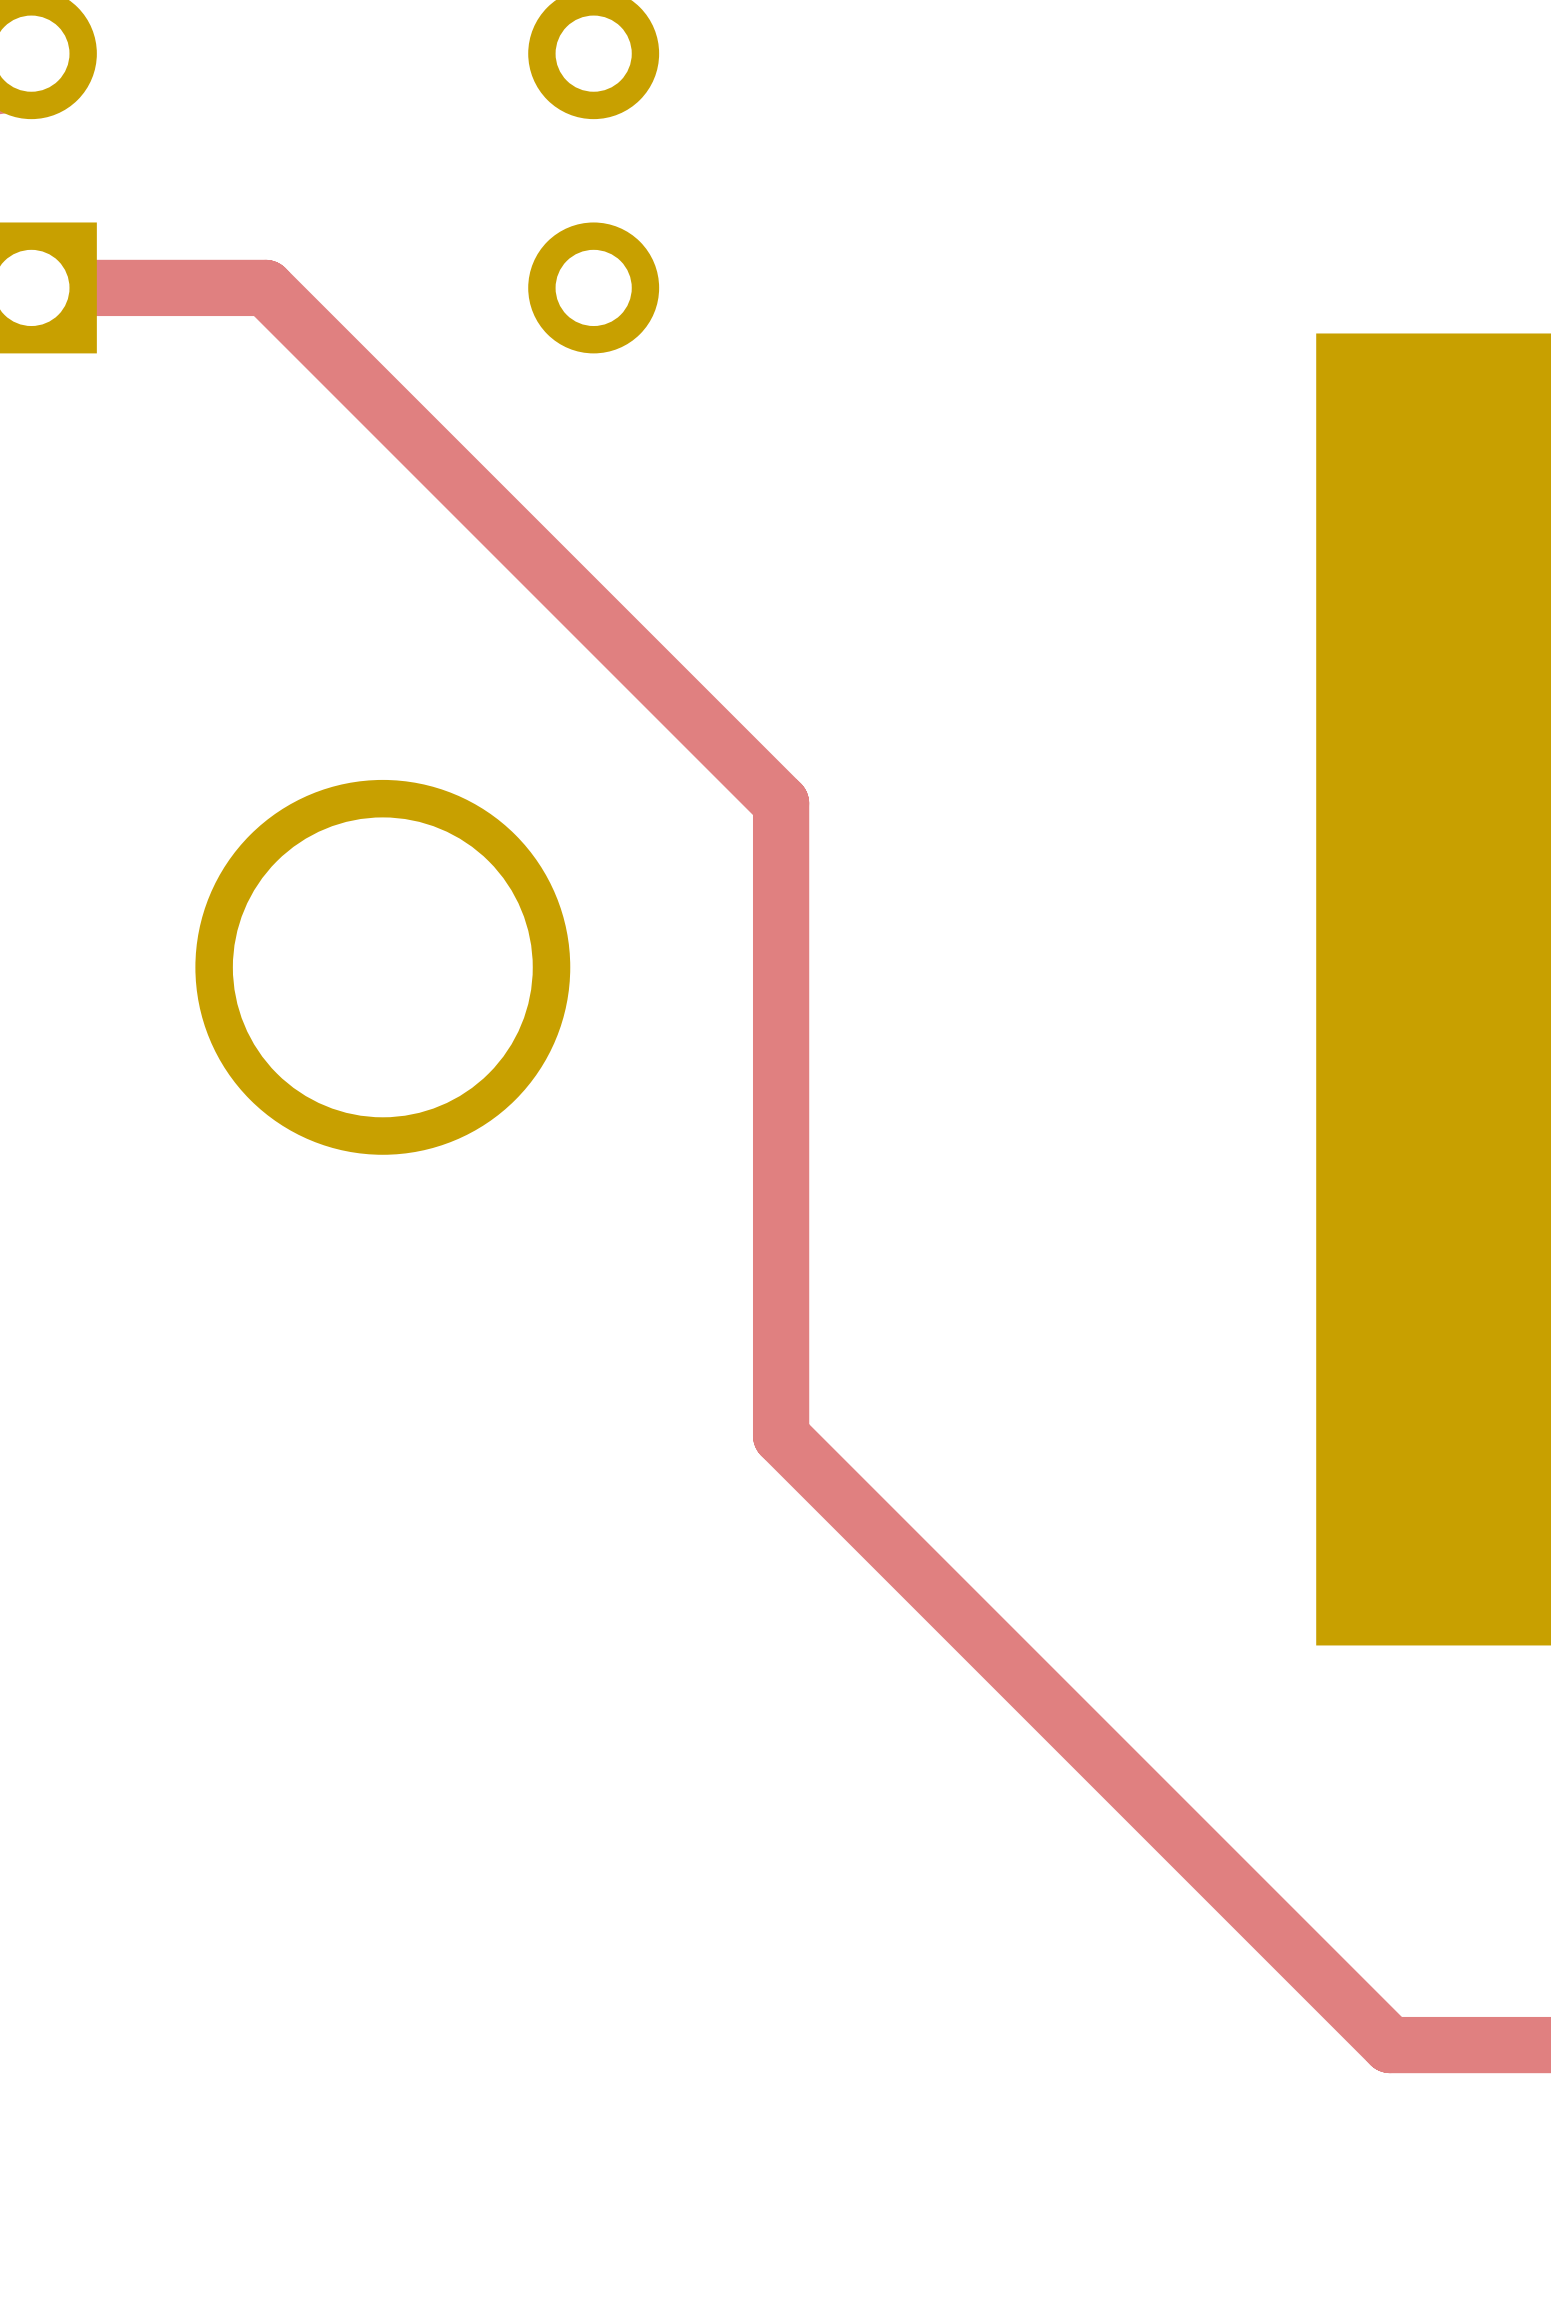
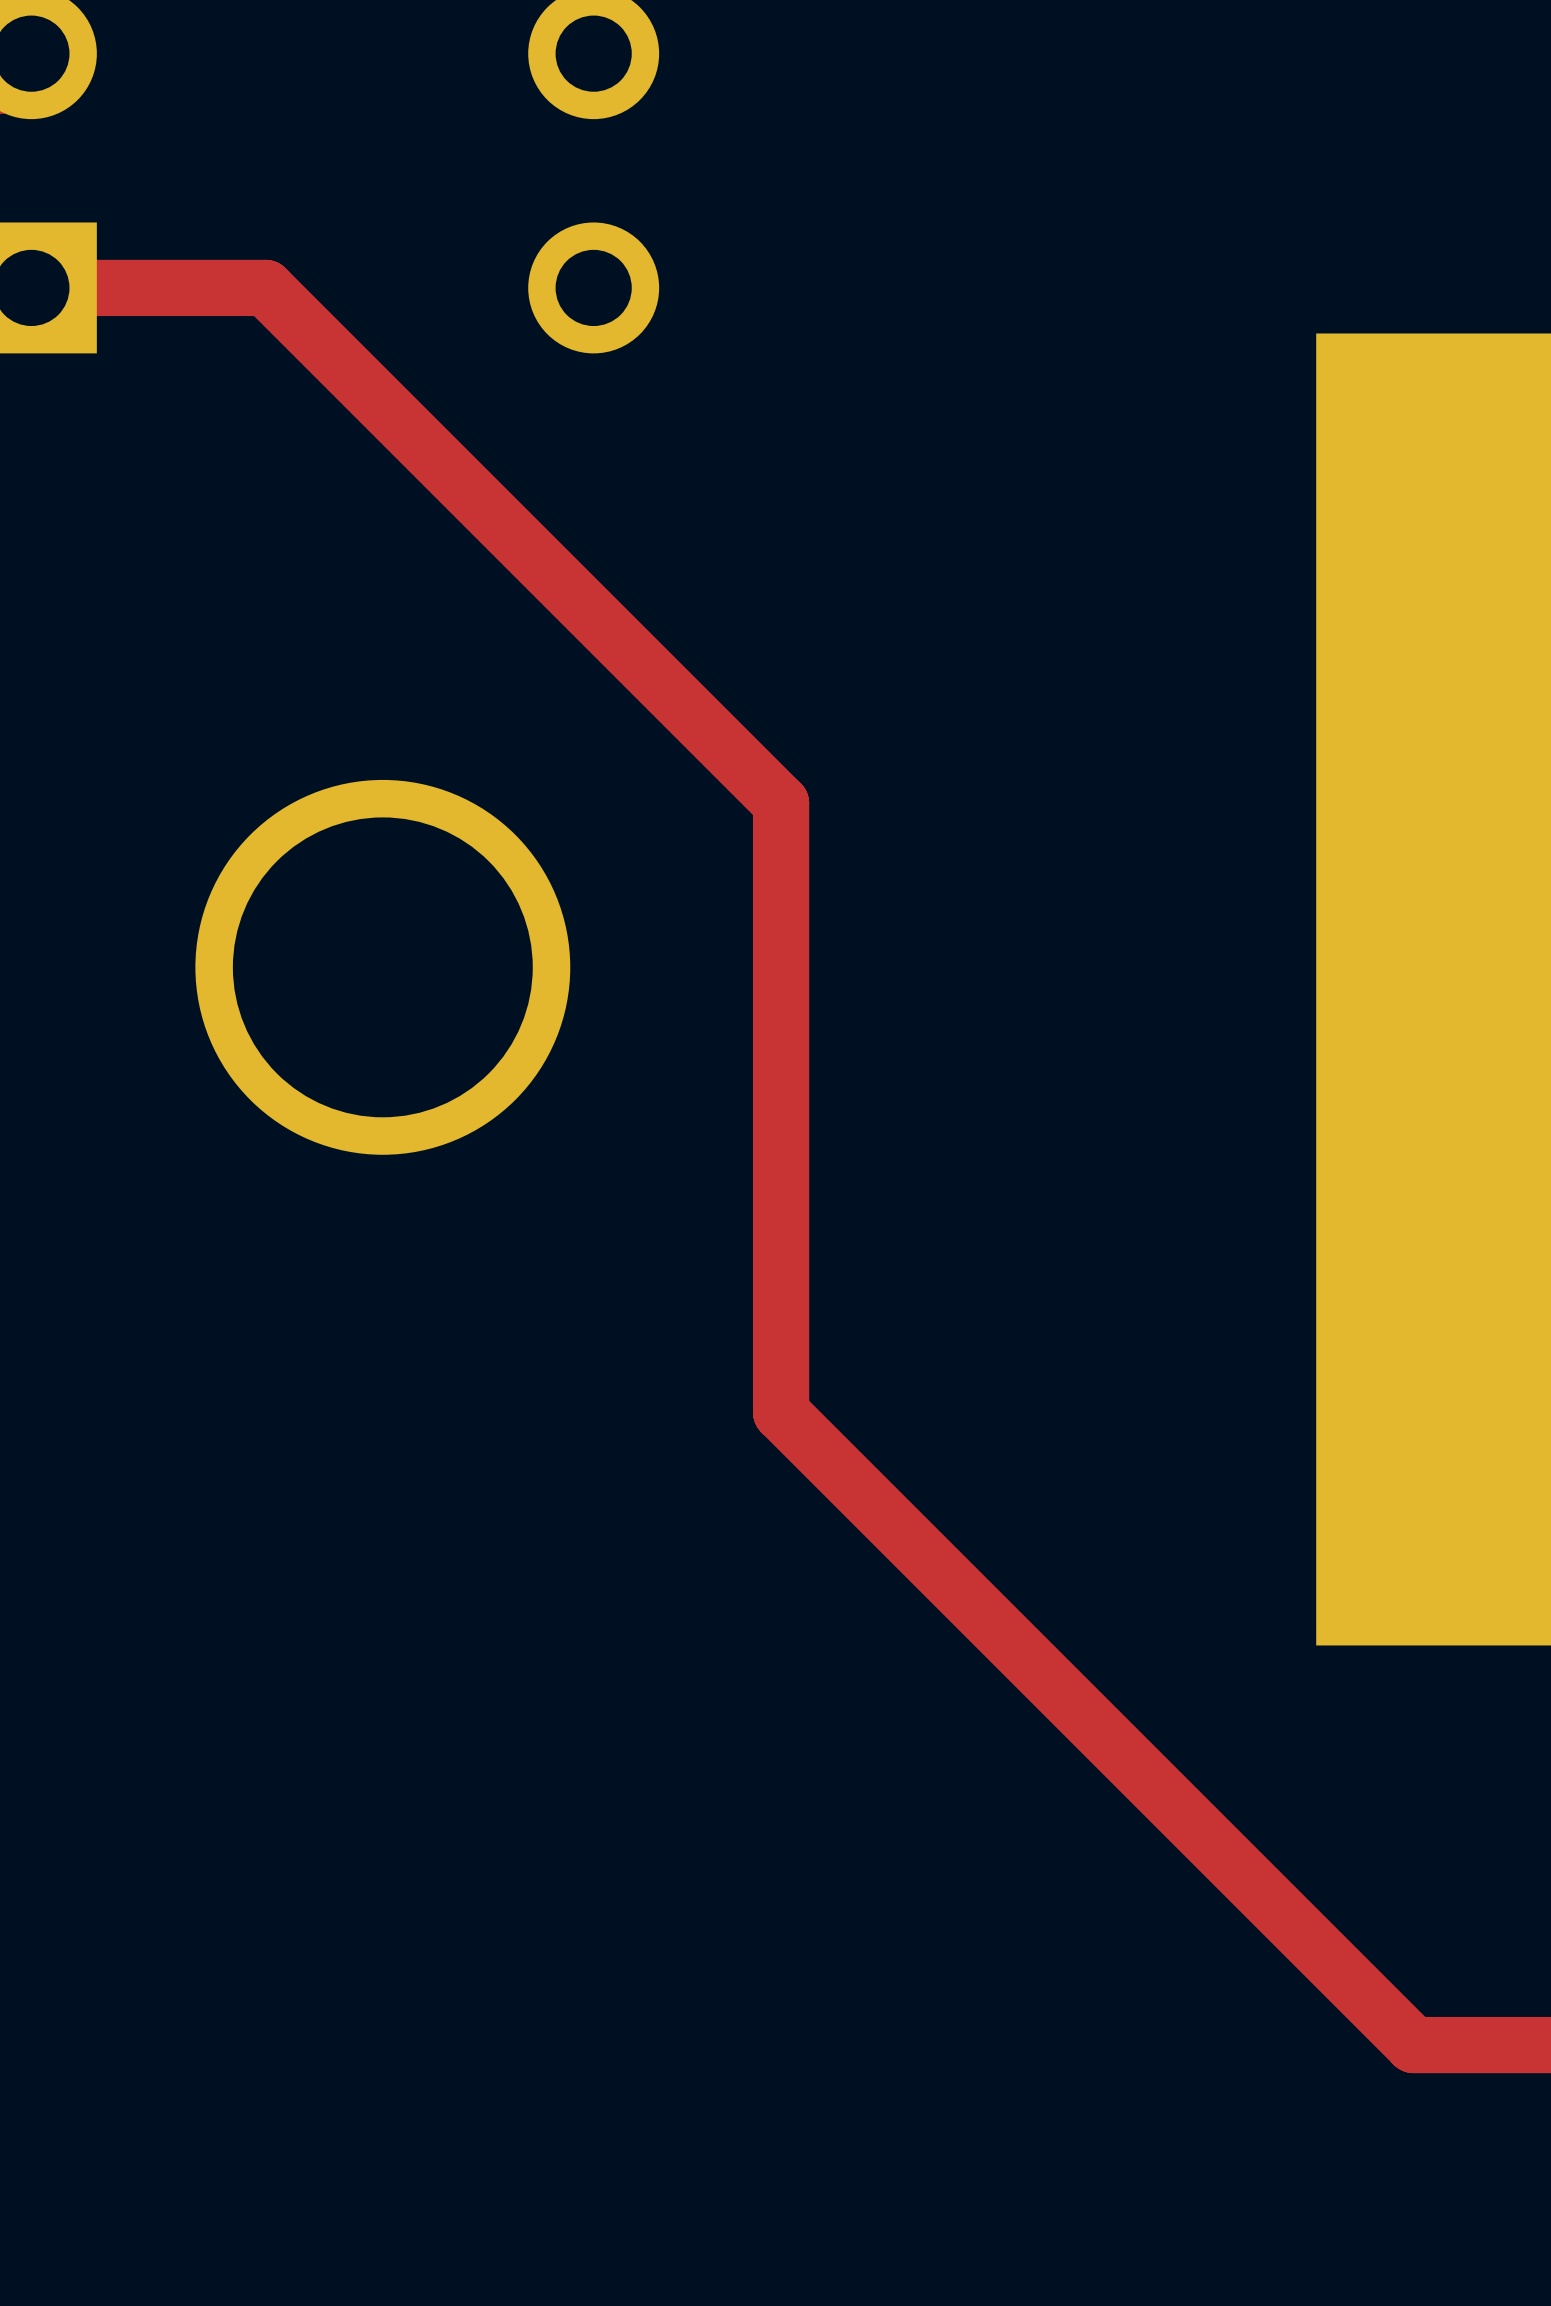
track: (781, 1412) (781, 1435) (1390, 2045) (1413, 2045) -> (781, 1412) (1413, 2045)

